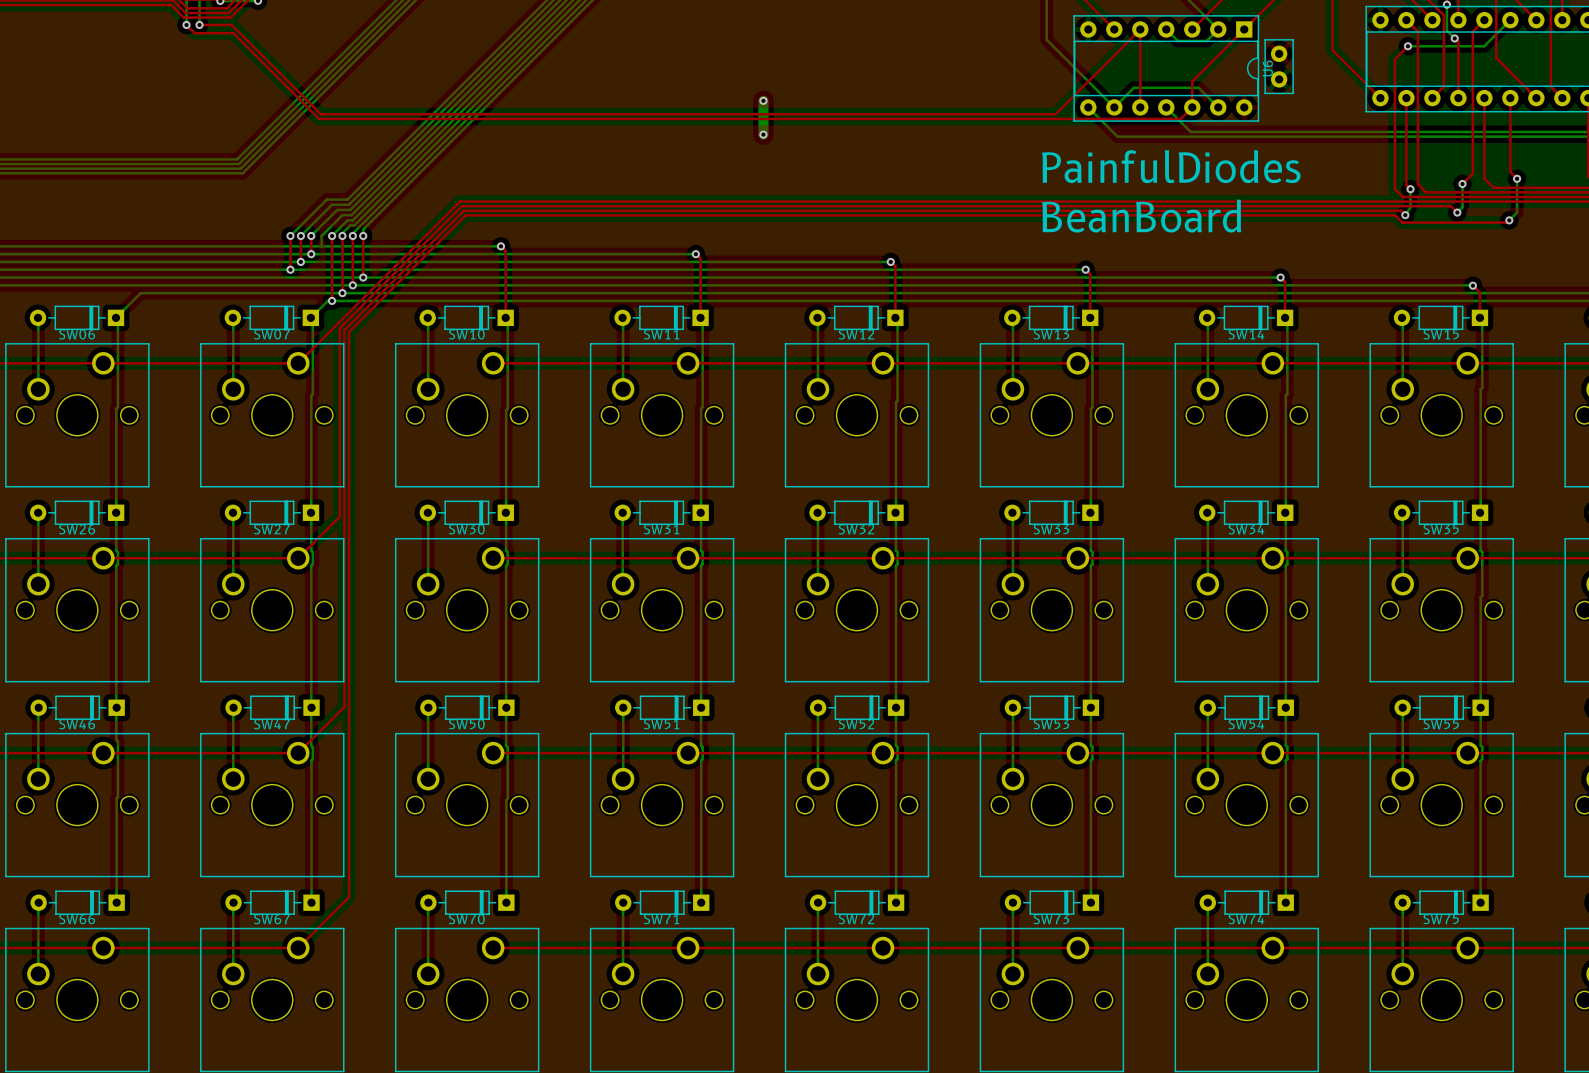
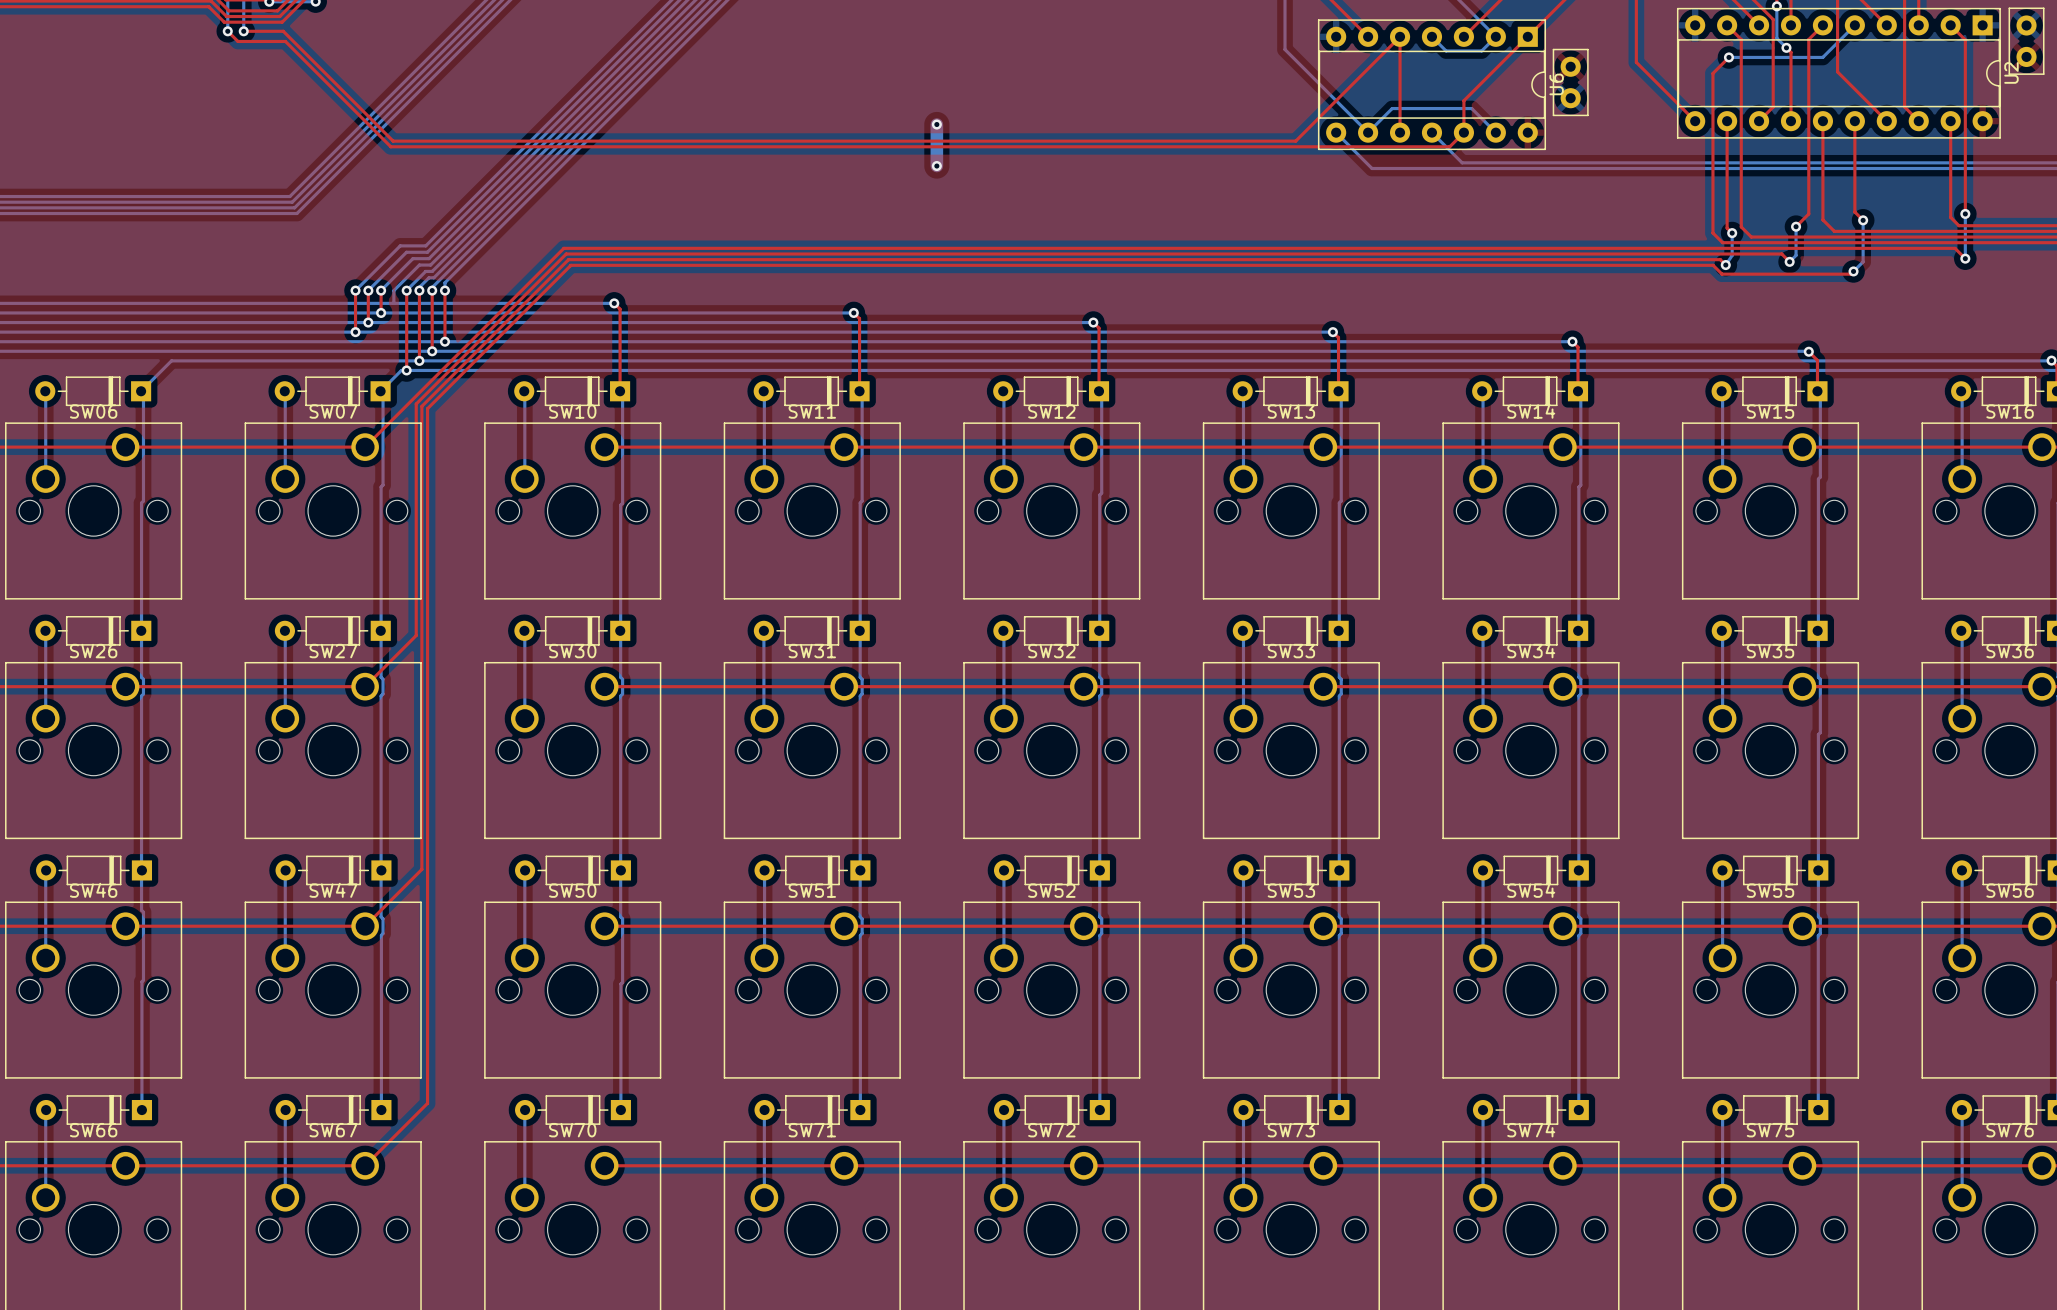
text: PainfulDiodes (1171, 166) -> none
text: BeanBoard (1141, 216) -> none

